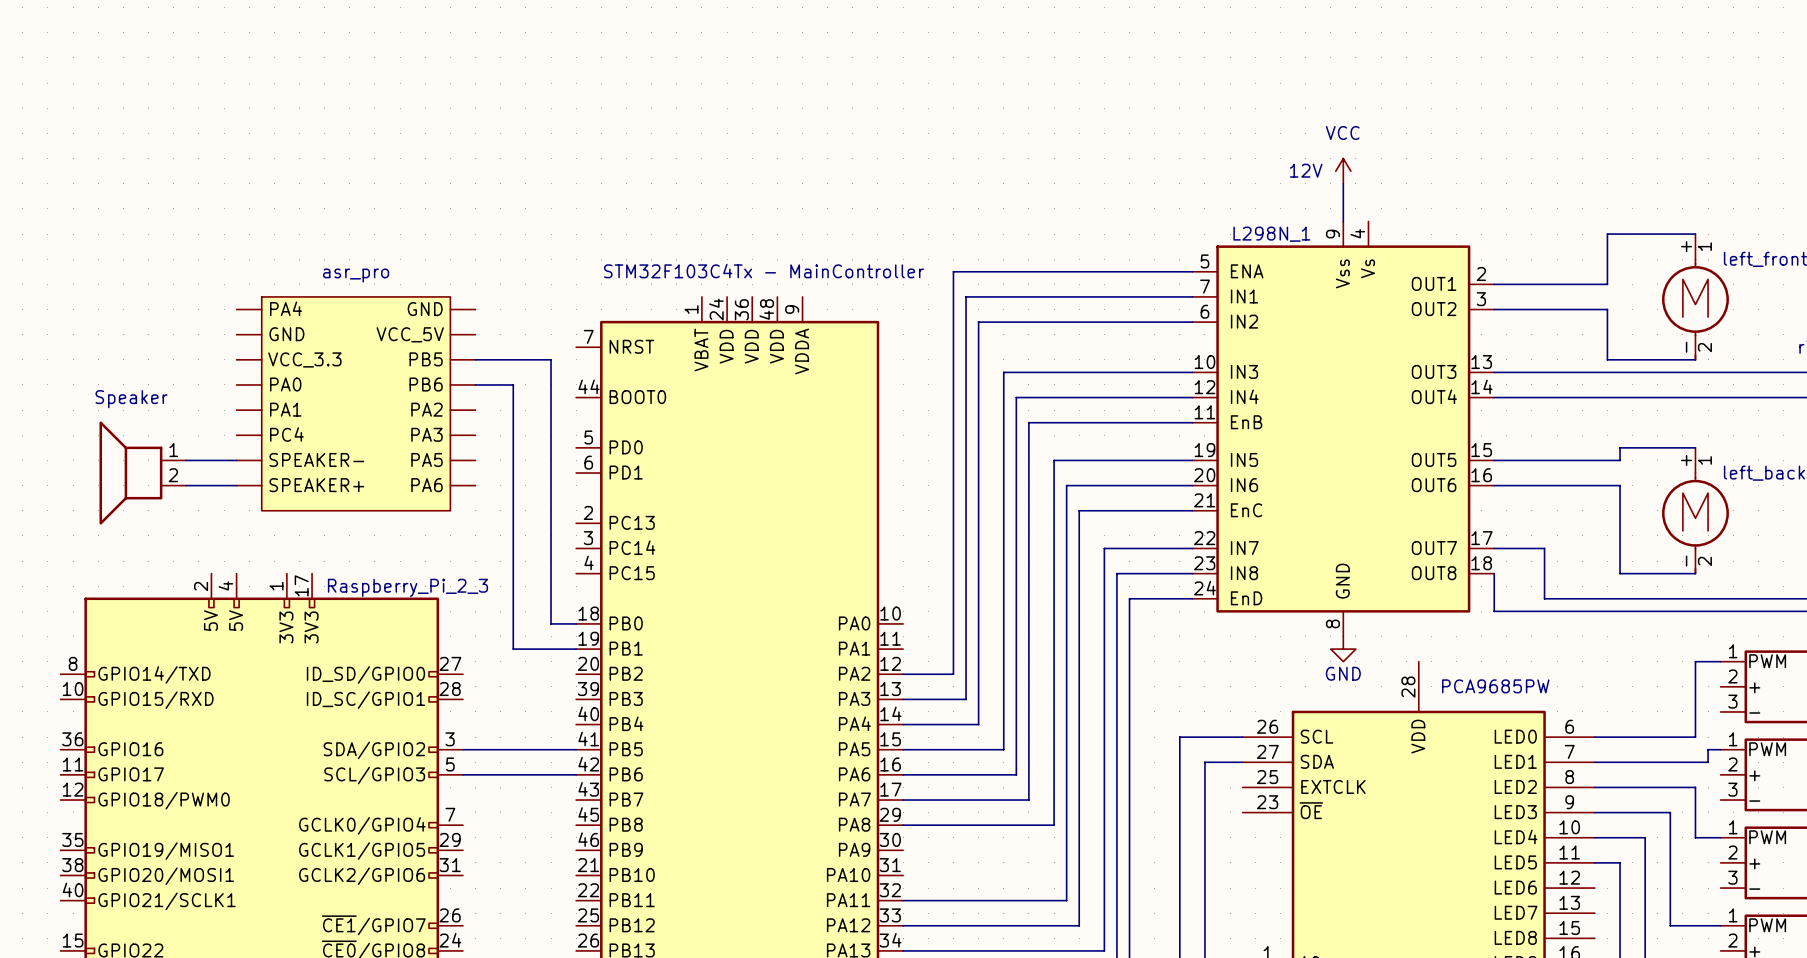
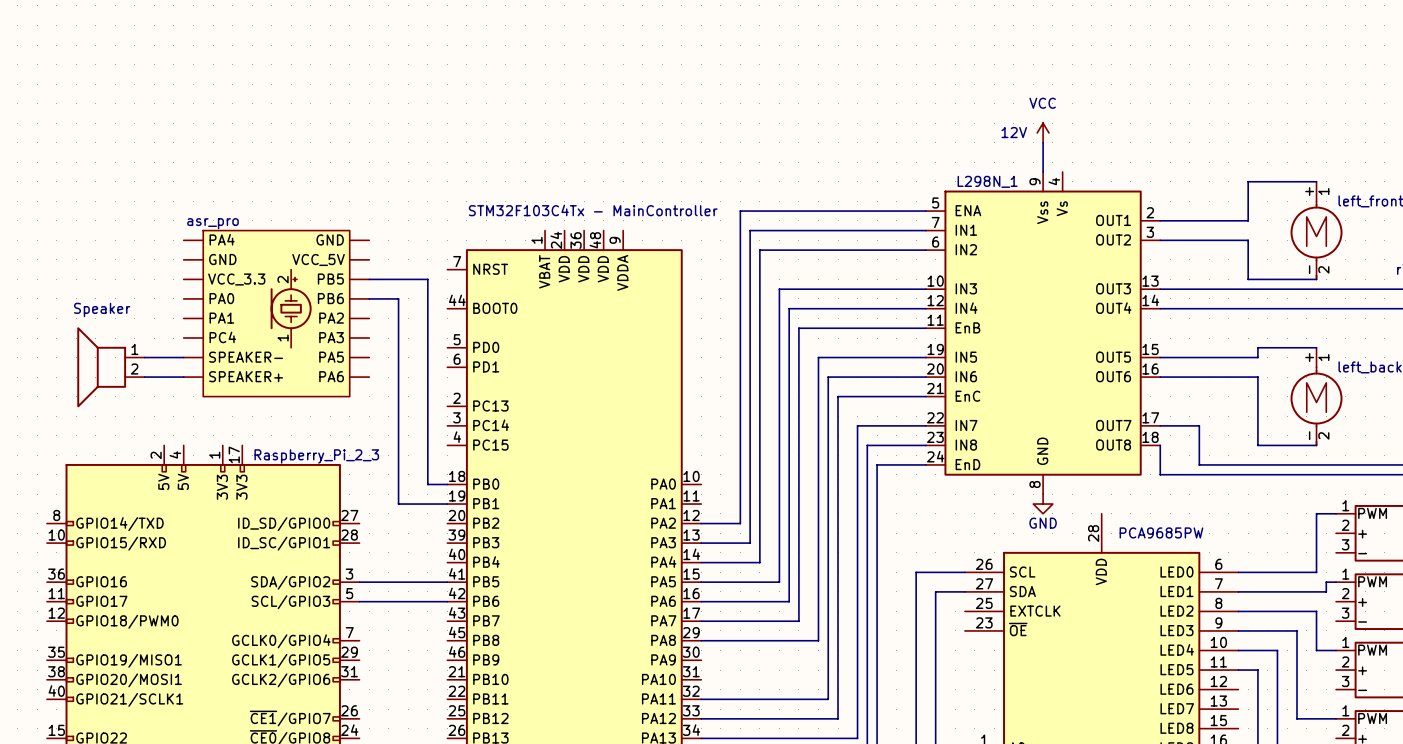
part value position: asr_pro (356, 275) -> asr_pro (213, 223)
part: none -> (291, 308)

